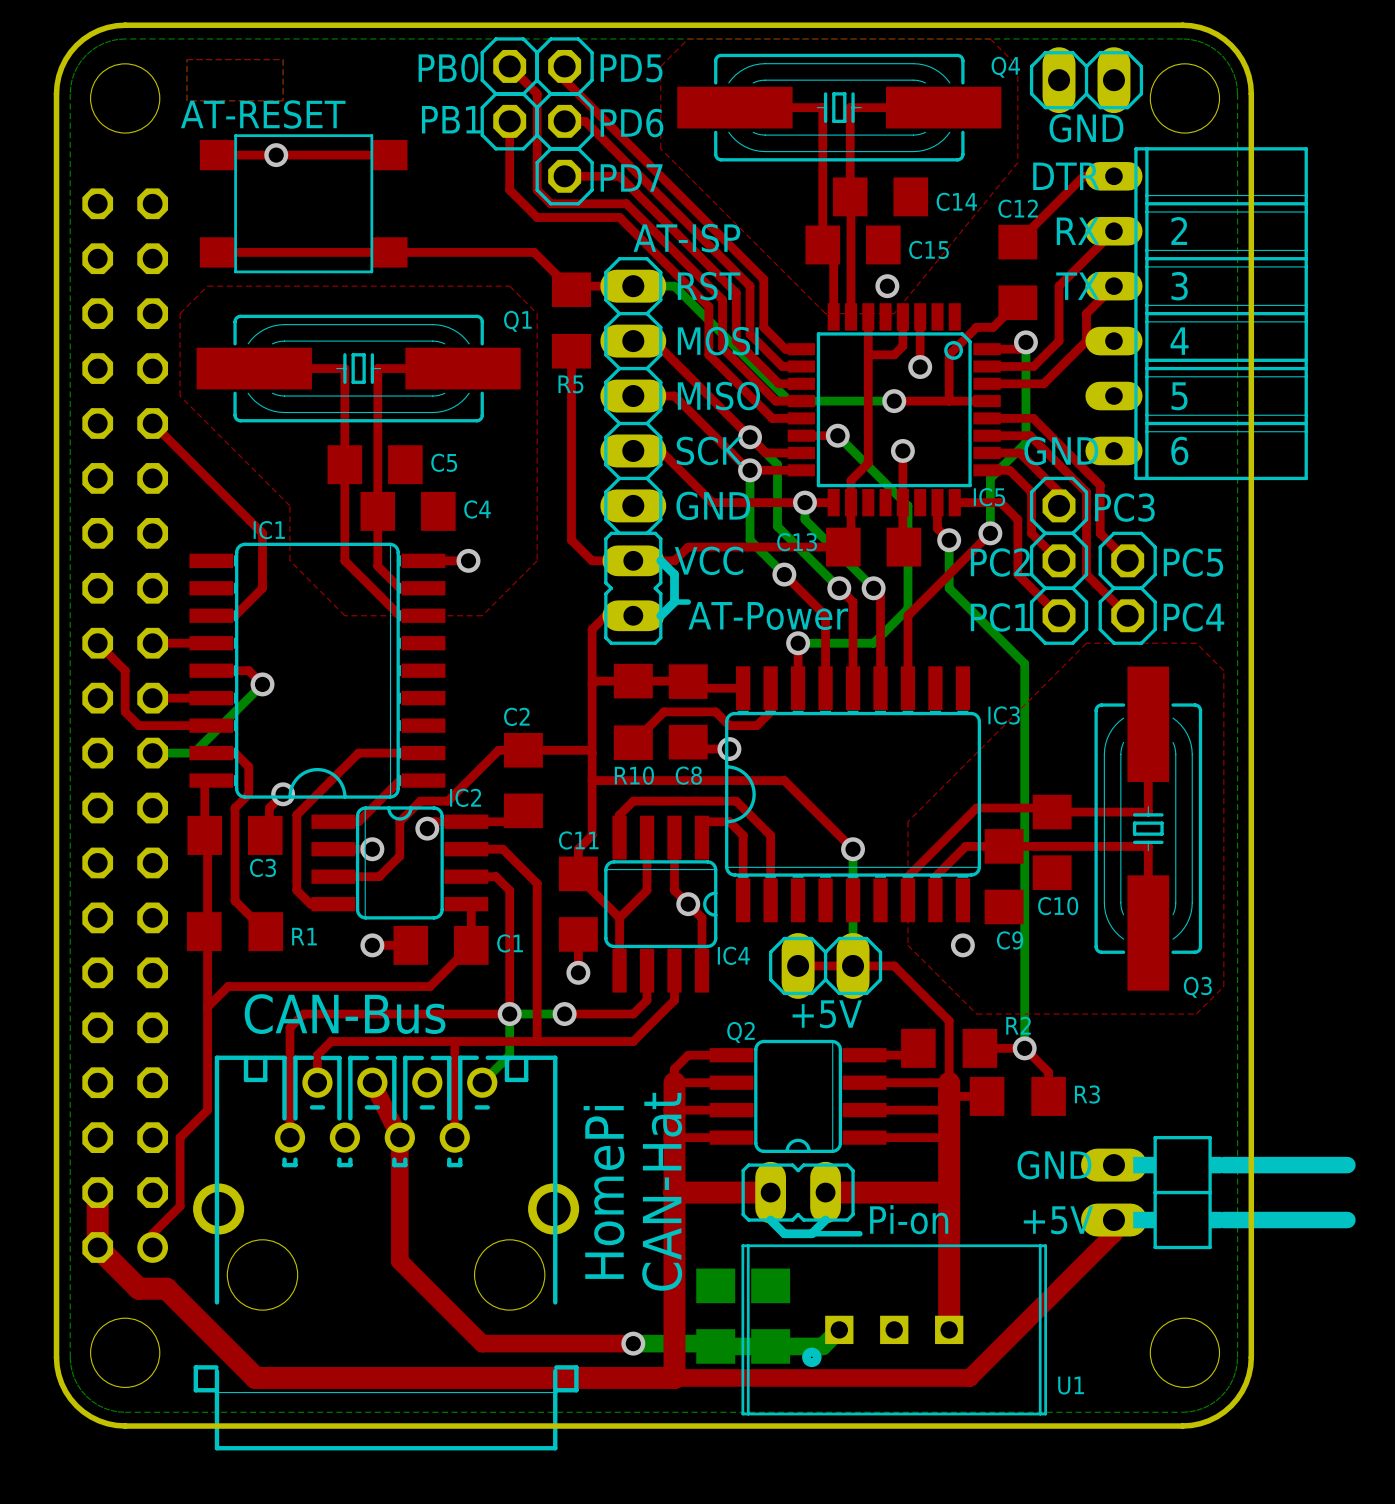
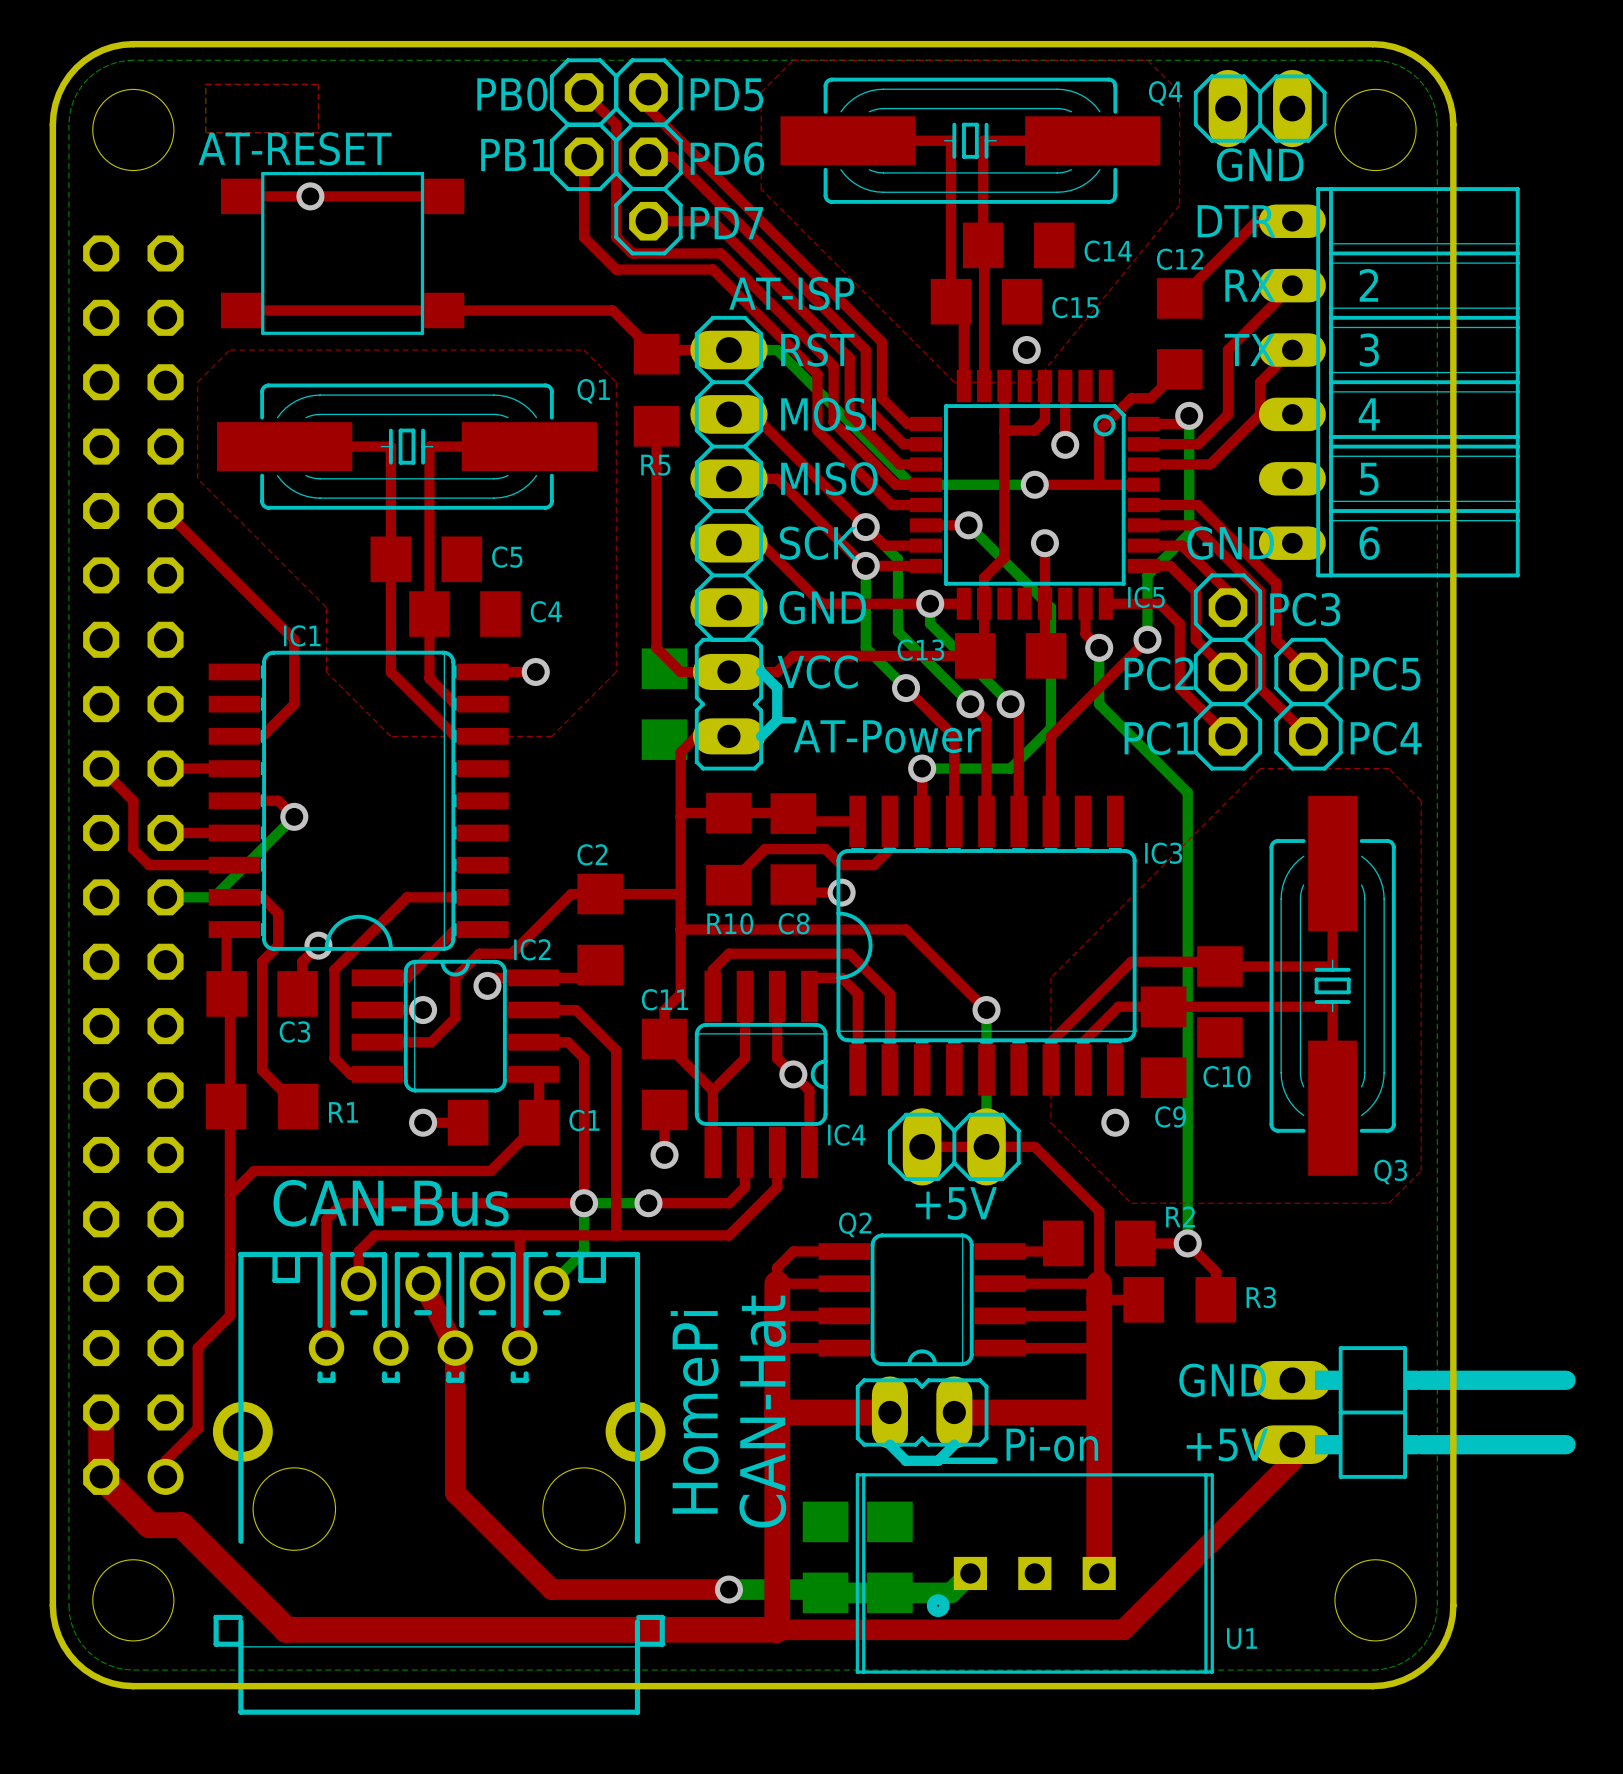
part: none -> (664, 704)

